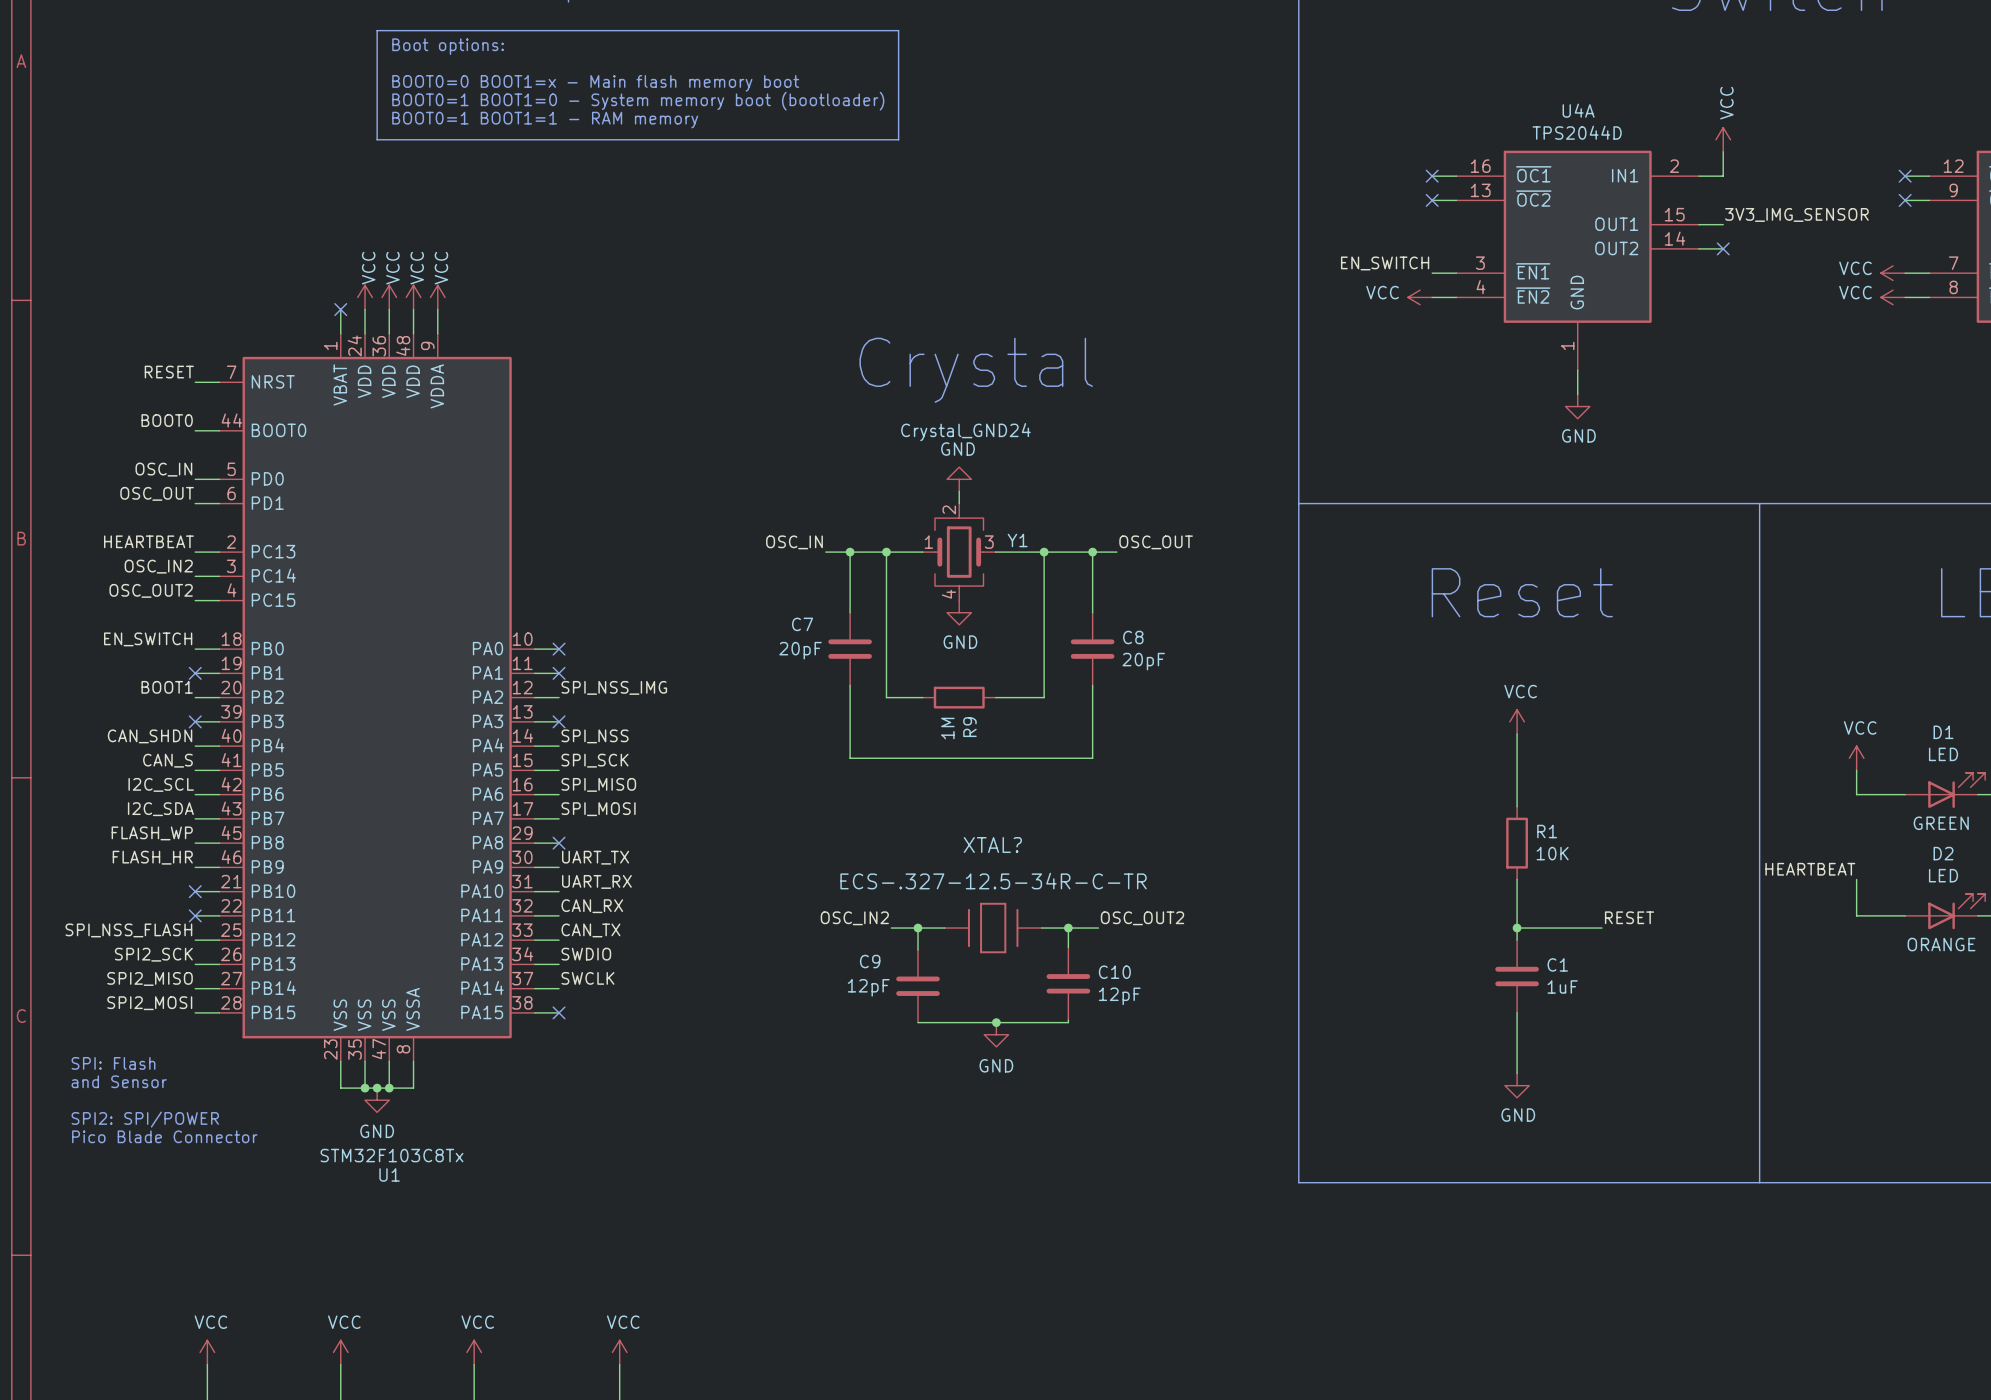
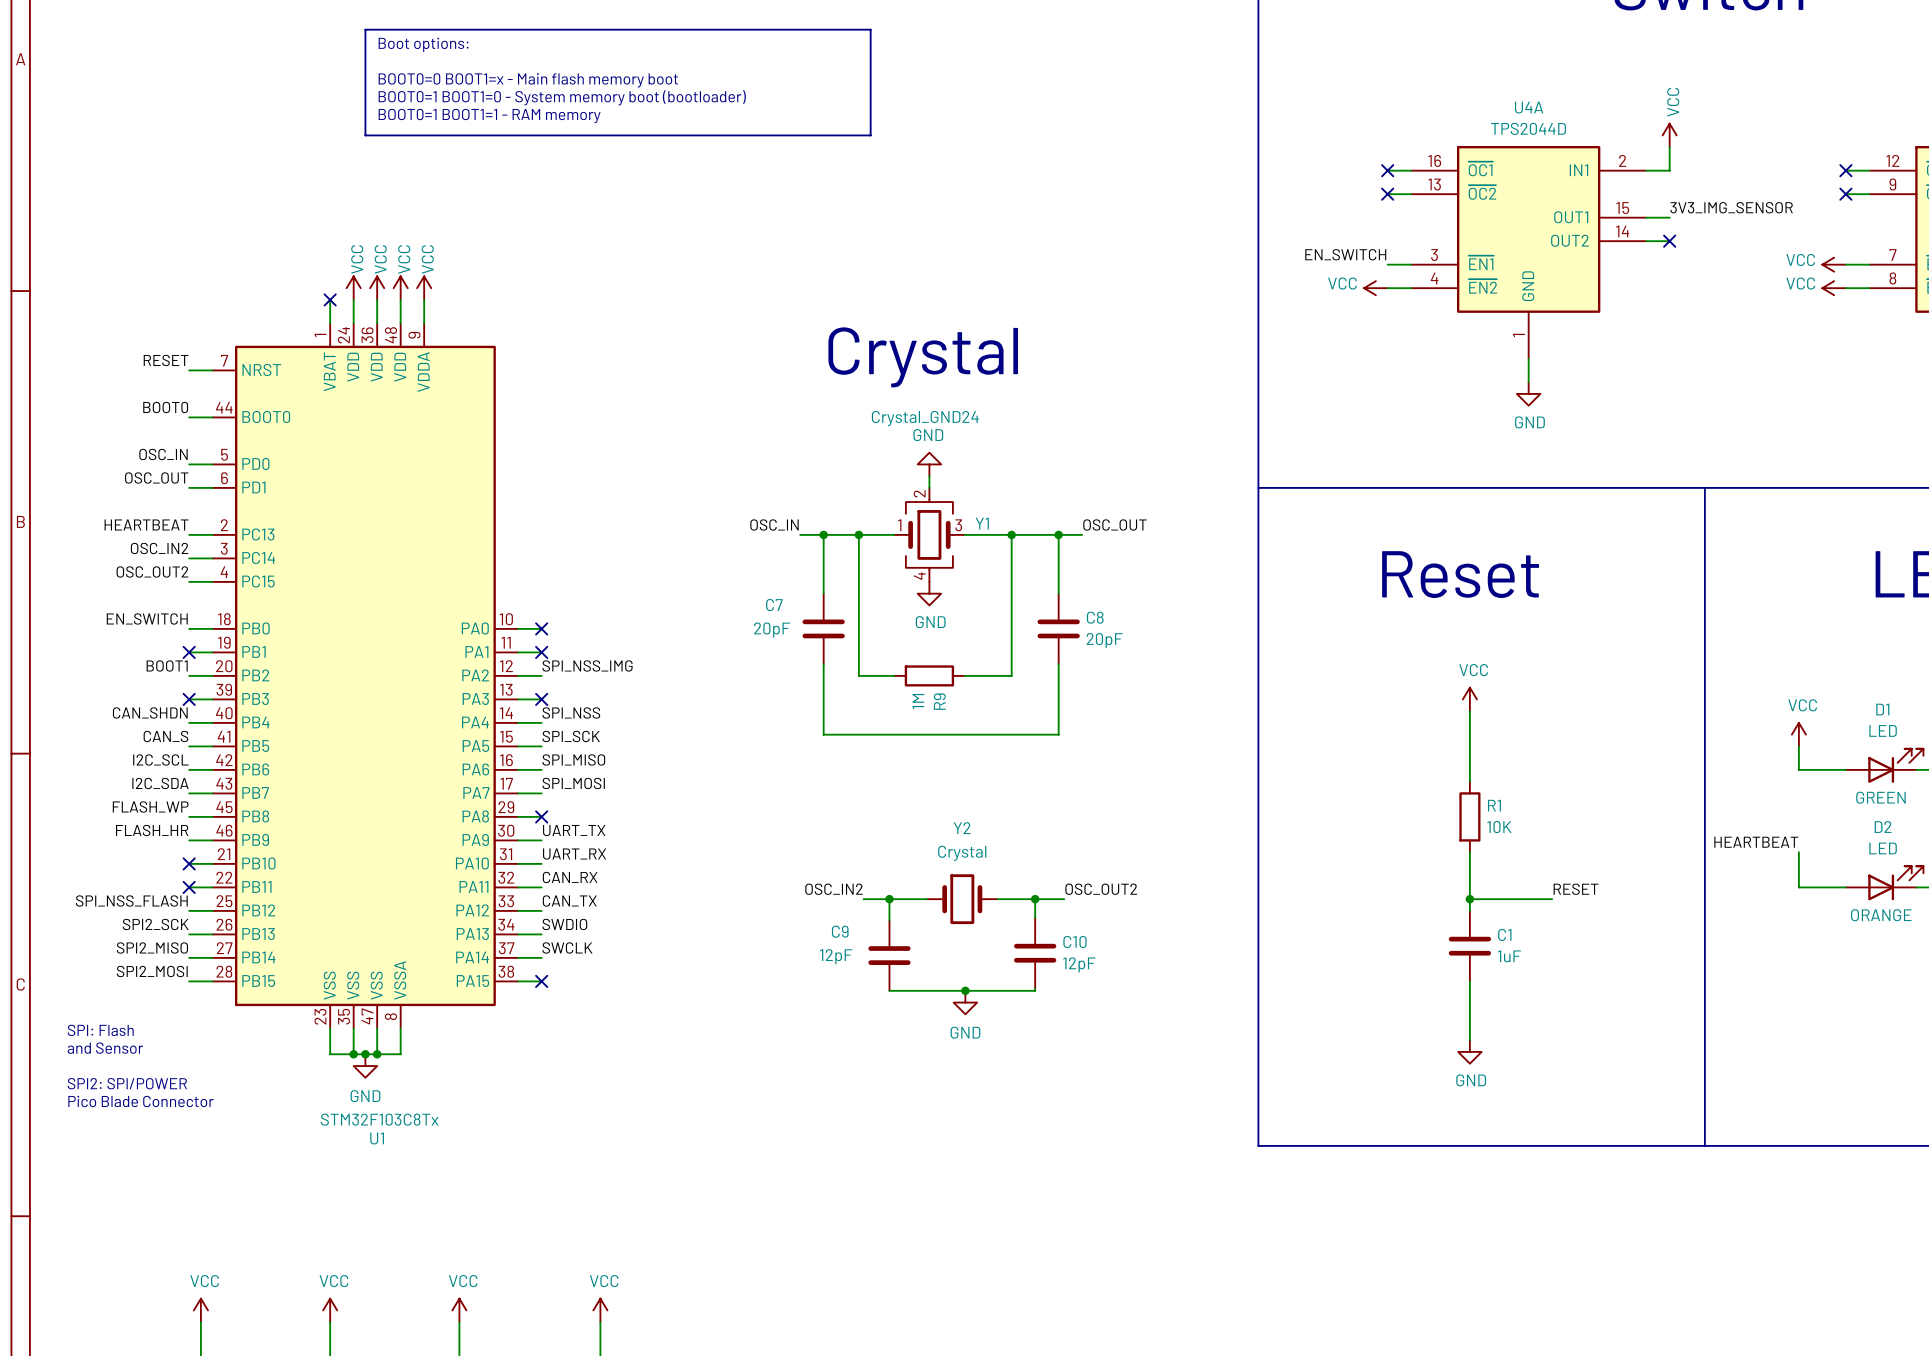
XTAL?: ECS-.327-12.5-34R-C-TR (993, 928) -> none
Y2: none -> Crystal (962, 899)

